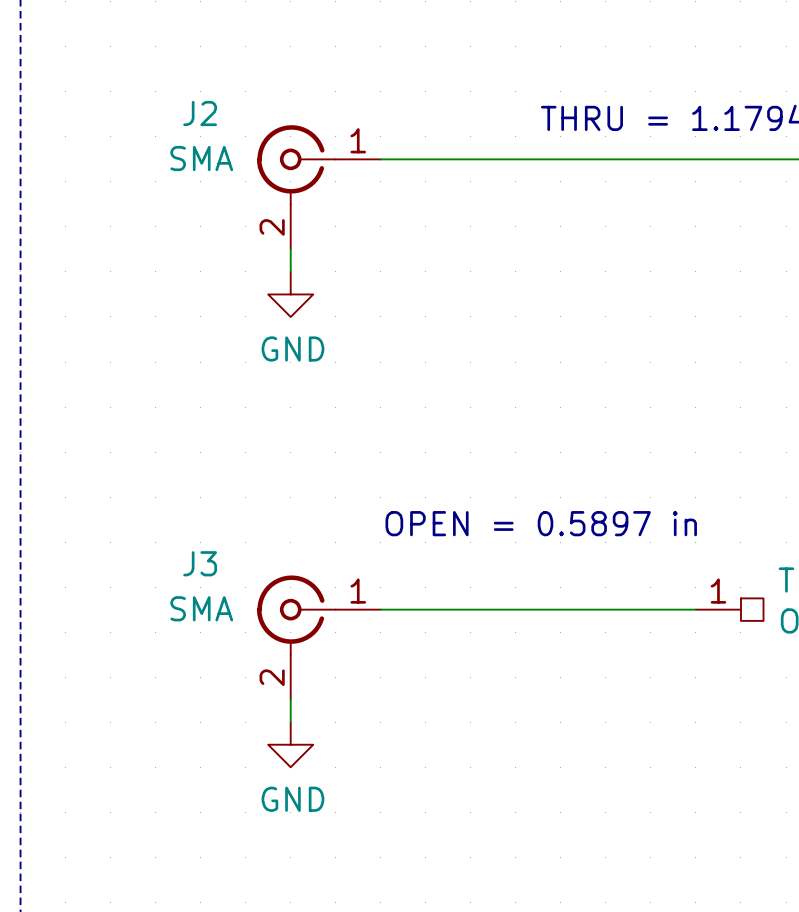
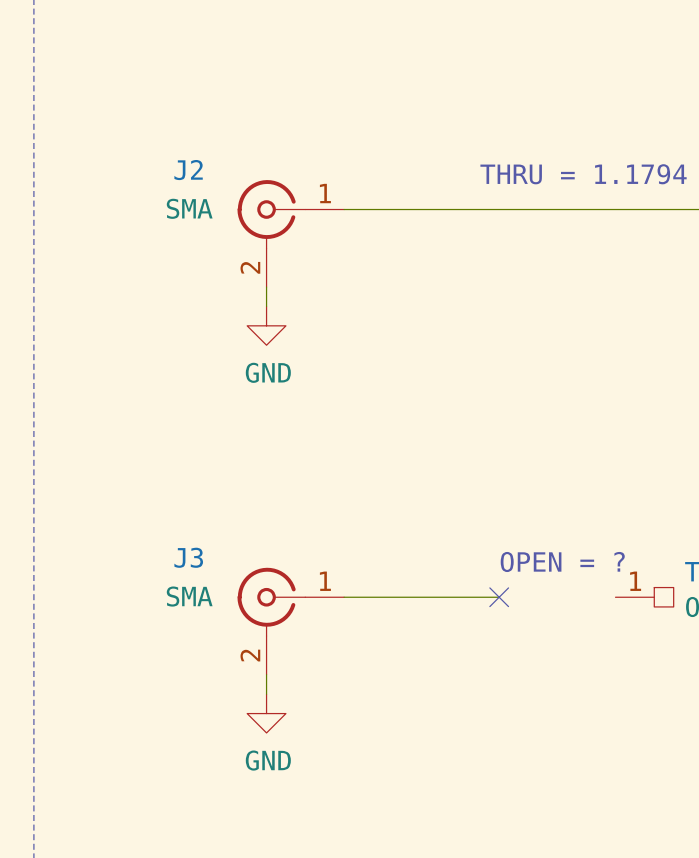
text: OPEN = 0.5897 in (541, 523) -> none
text: none -> OPEN = ? (562, 561)
wire: (560, 609) (695, 609) -> none
no-connect mark: none -> (499, 597)

